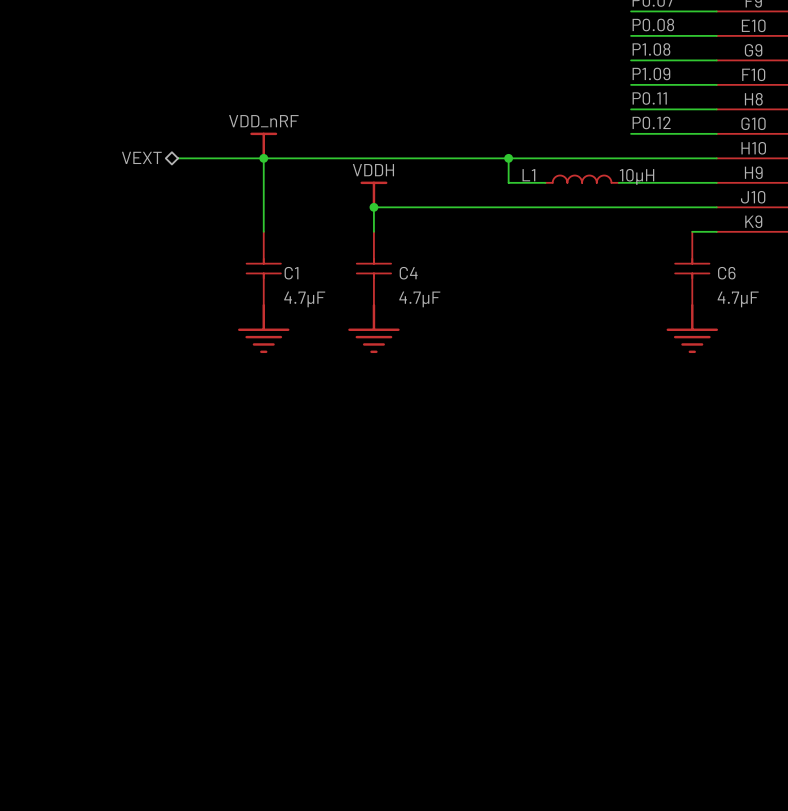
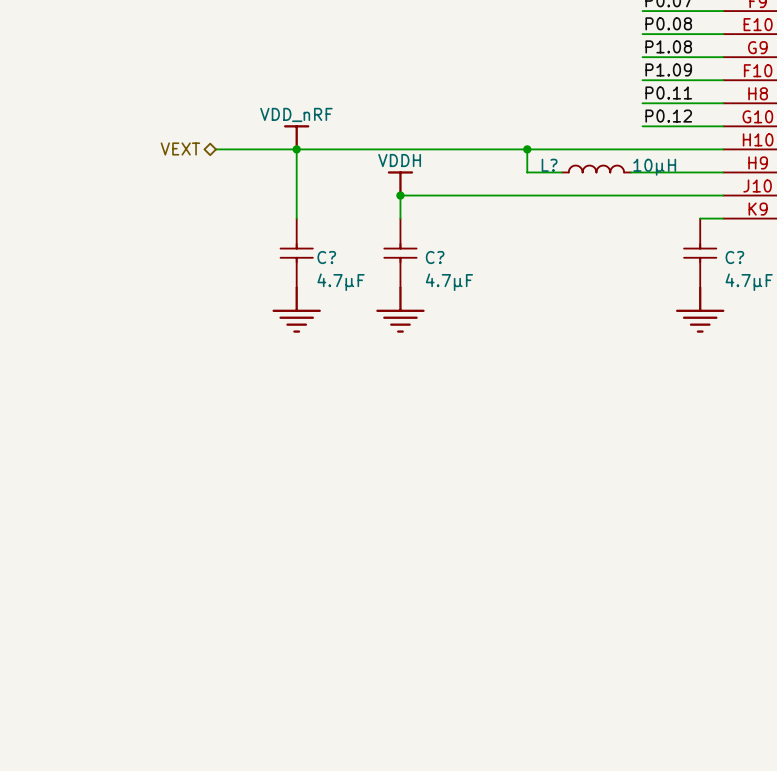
L1 name: L1 (528, 175) -> L? (549, 165)
C1 name: C1 (291, 273) -> C? (326, 257)
C4 name: C4 (408, 273) -> C? (435, 257)
C6 name: C6 (726, 273) -> C? (734, 257)

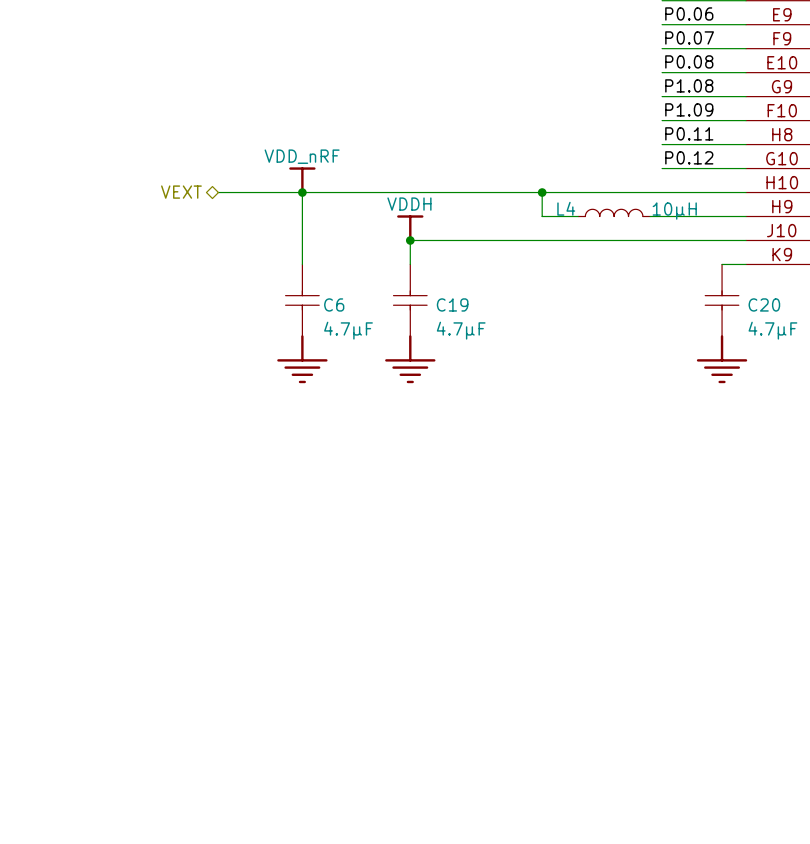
L? name: L? (549, 165) -> L4 (566, 208)
C? name: C? (326, 257) -> C6 (334, 304)
C? name: C? (435, 257) -> C19 (452, 304)
C? name: C? (734, 257) -> C20 (764, 304)

